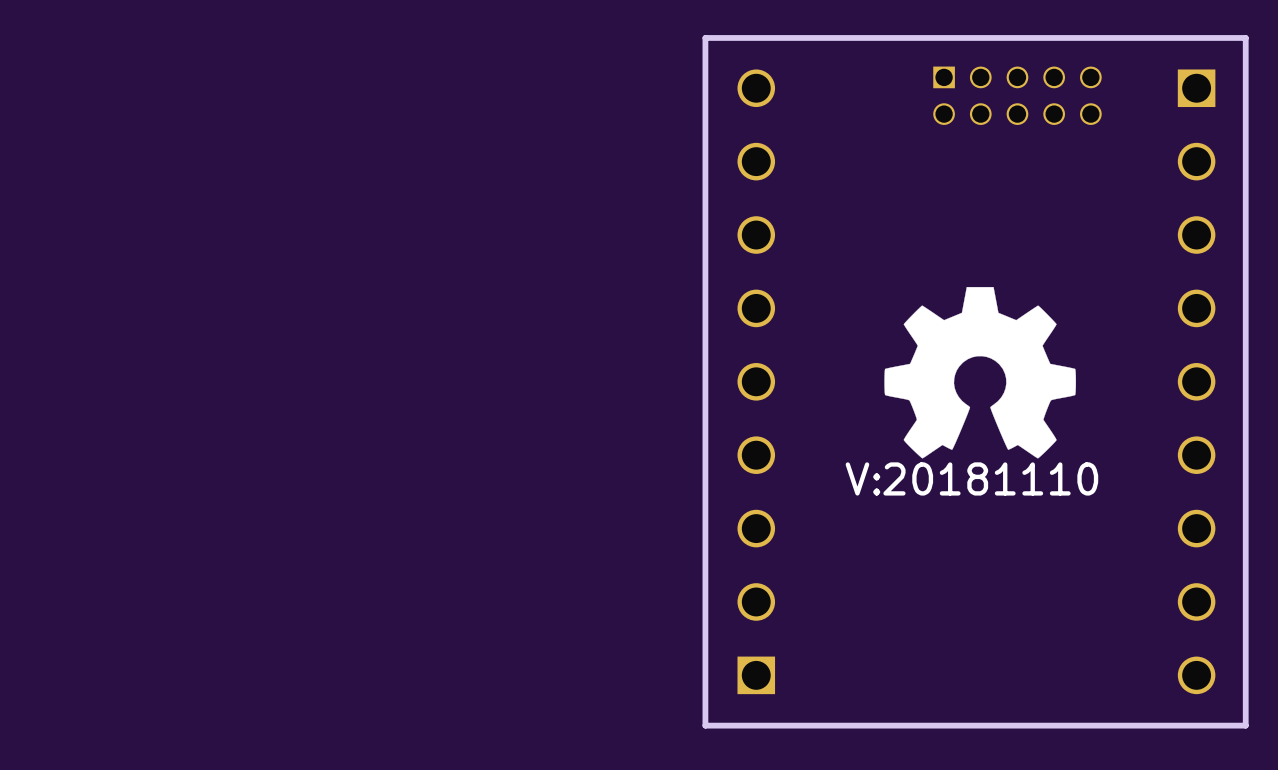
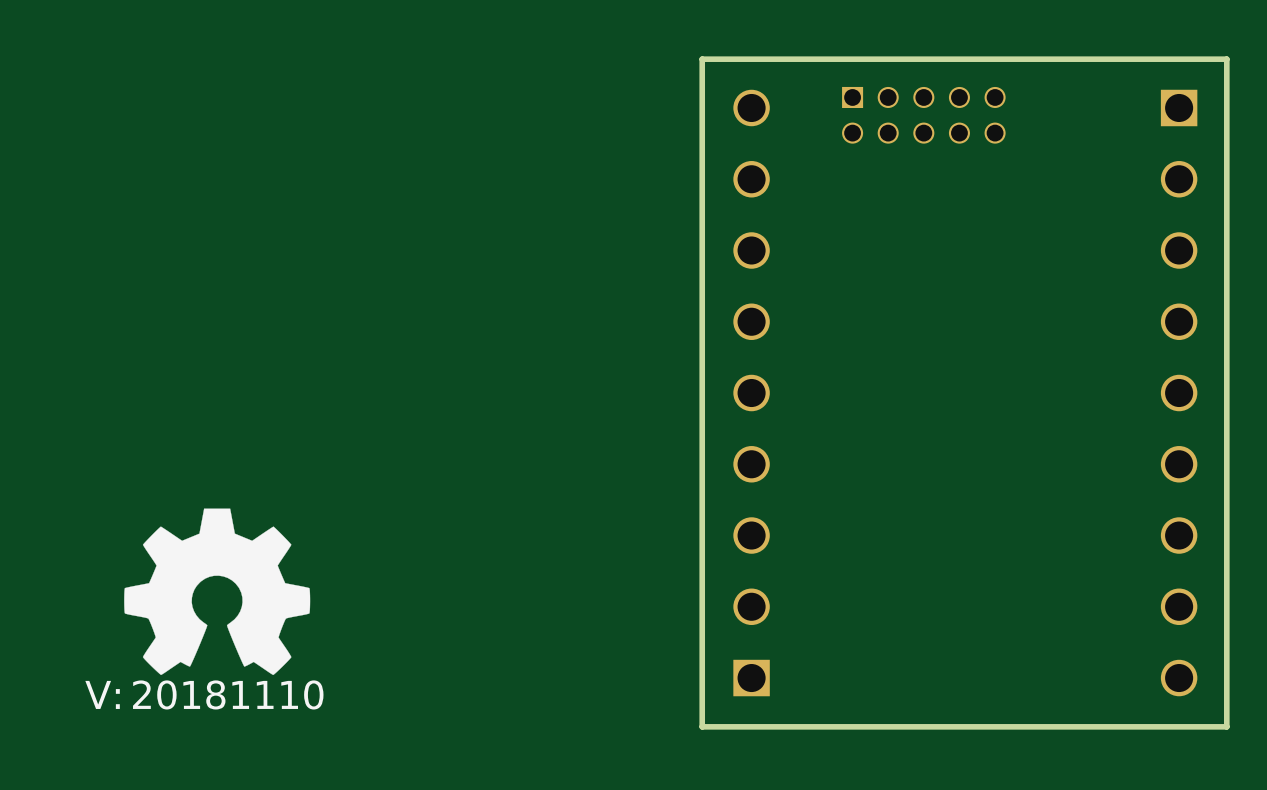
part position: (1017, 95) -> (923, 115)
drawing: [884, 287, 1076, 459] -> none
drawing: none -> [124, 508, 311, 676]

